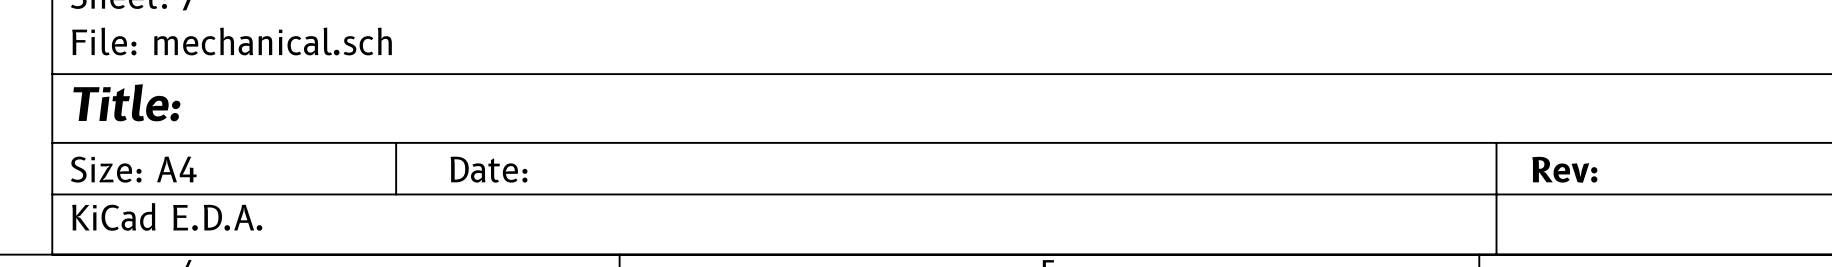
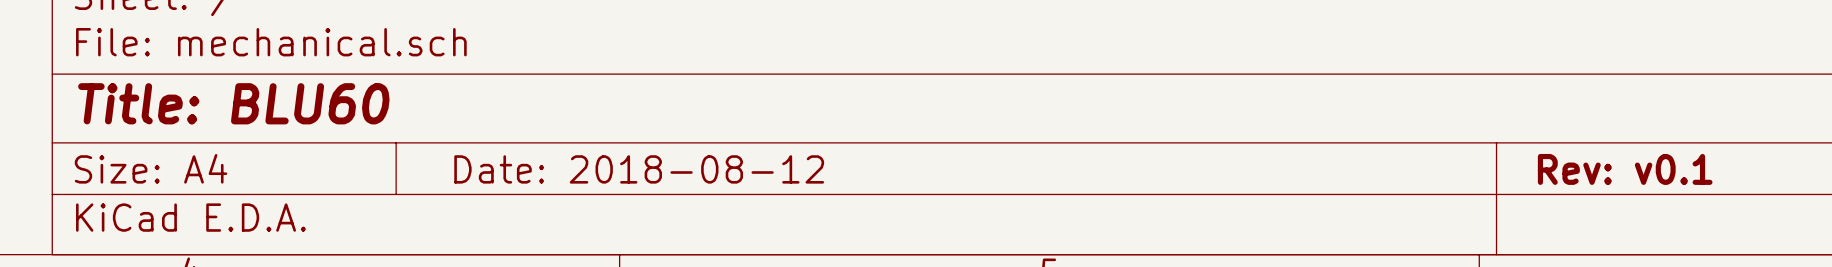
title block: Title: (126, 102) -> Title: BLU60 (233, 103)
title block: Date: (489, 169) -> Date: 2018-08-12 (639, 169)
title block: Rev: (1564, 169) -> Rev: v0.1 (1625, 169)

